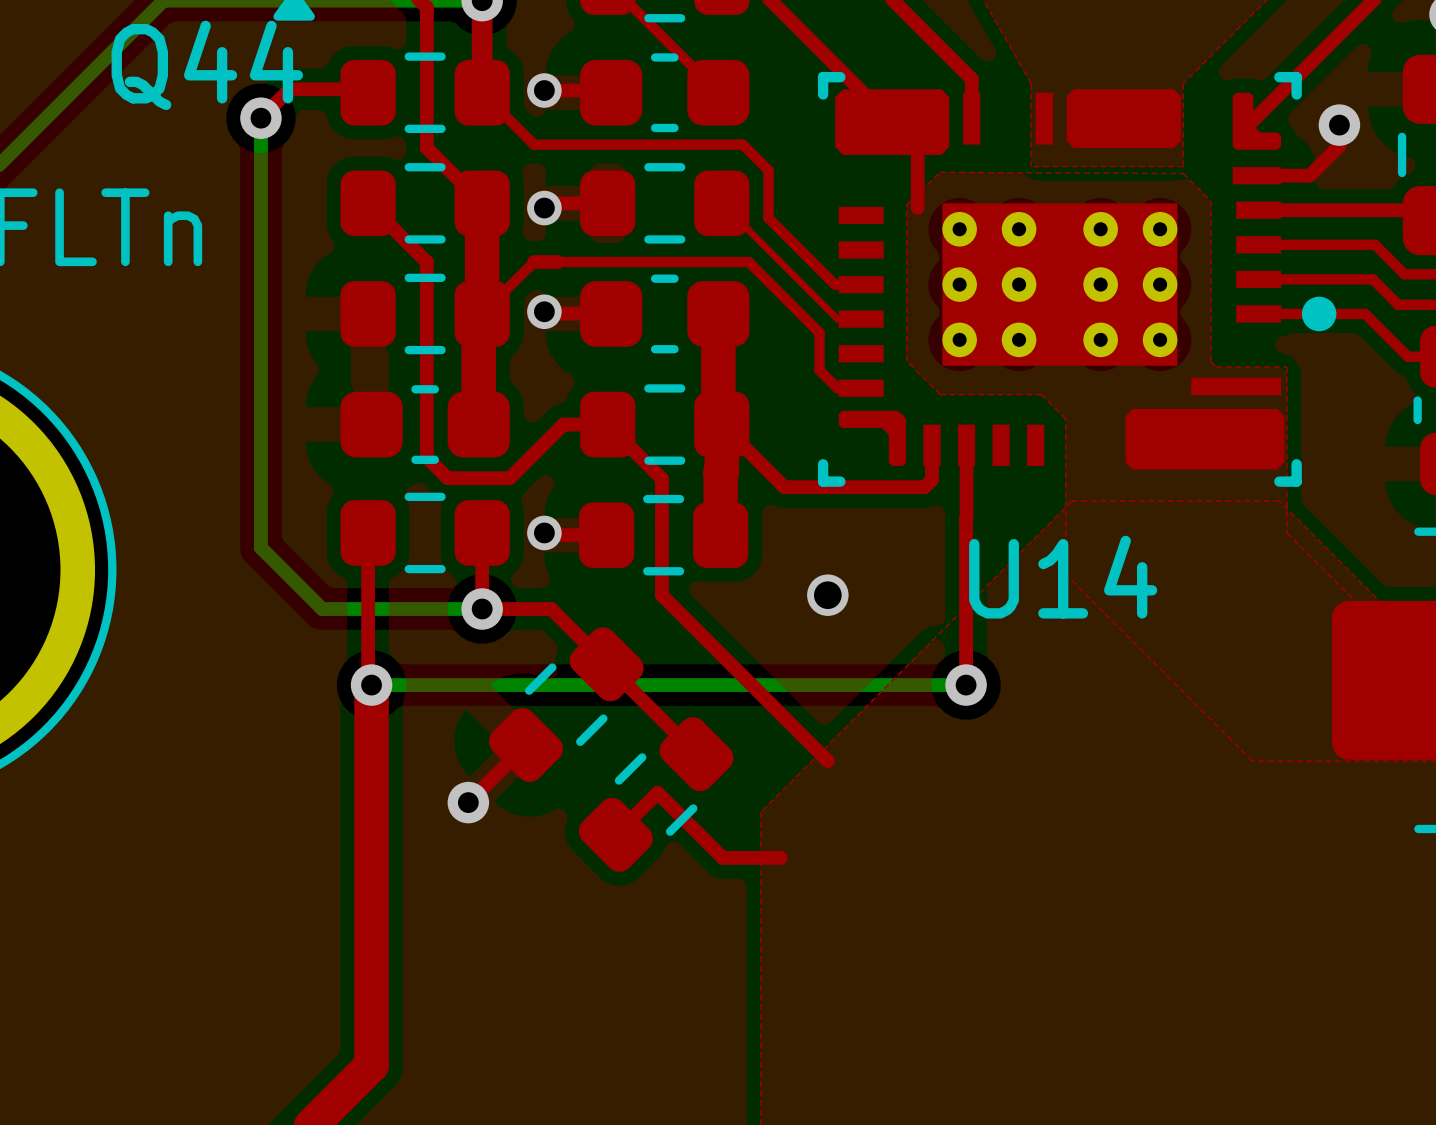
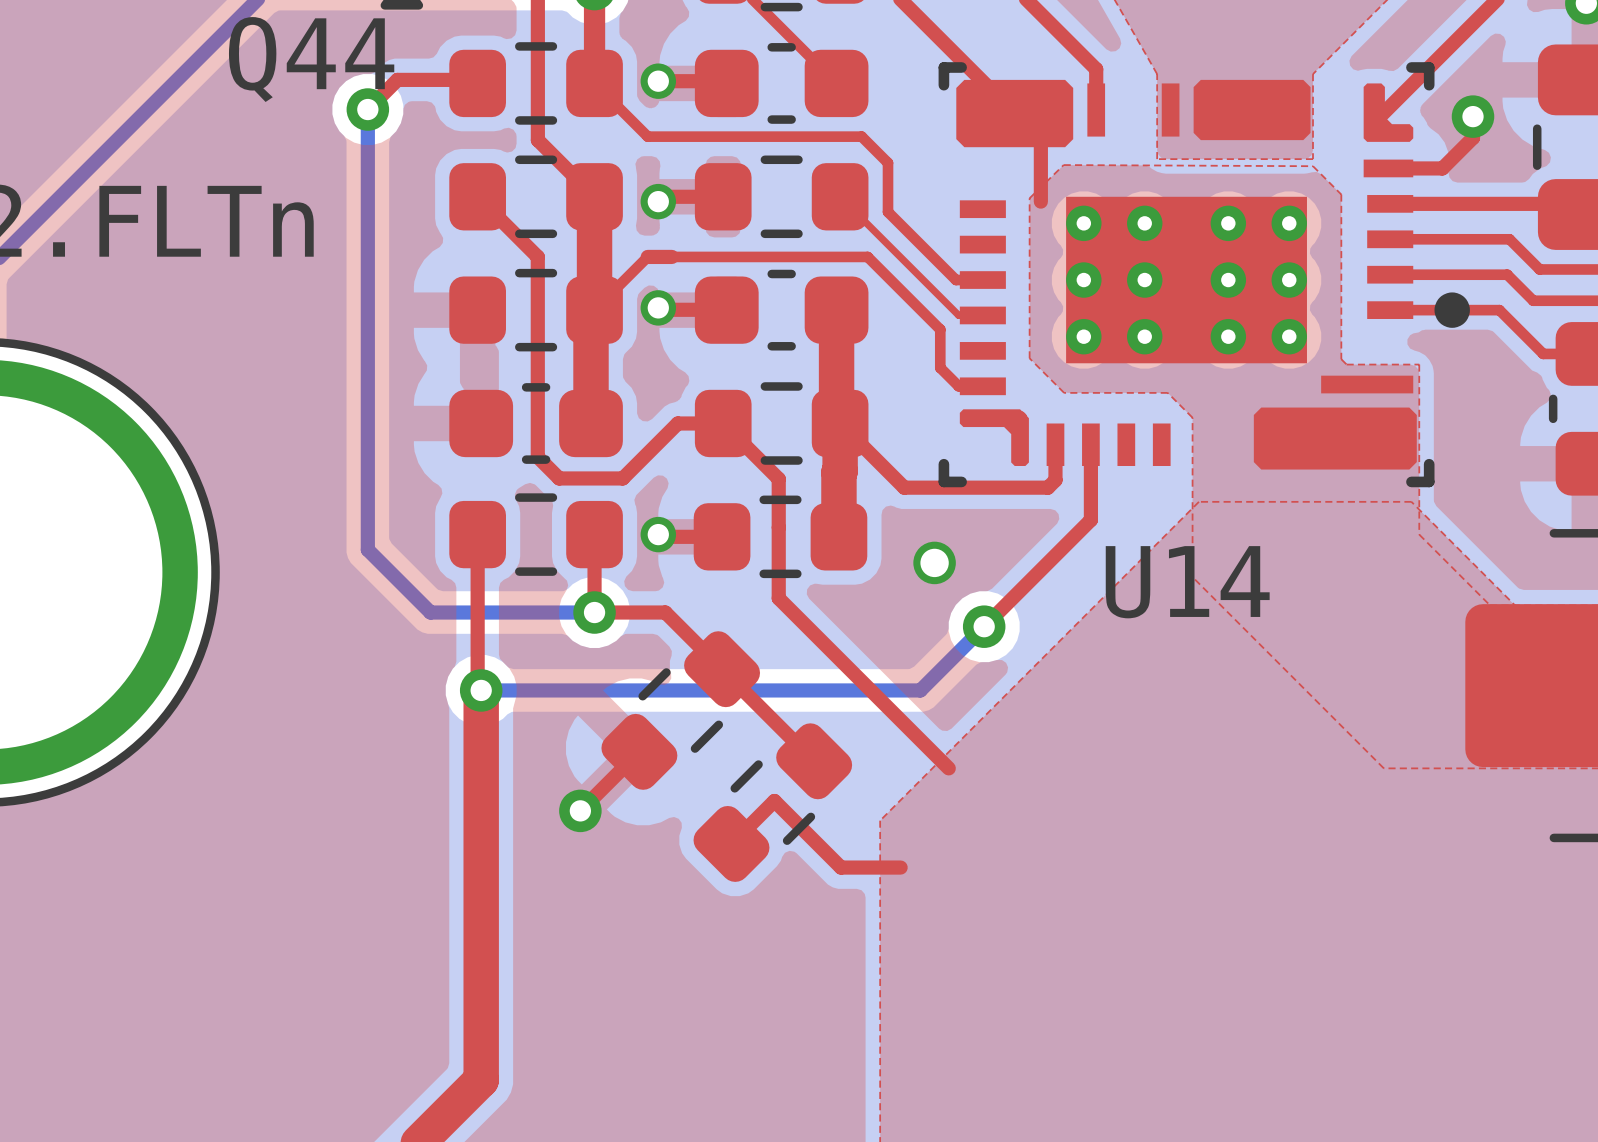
top track: (966, 519) (966, 685) -> (1090, 520) (984, 626)
via position: (827, 595) -> (934, 562)
bottom track: (800, 685) (966, 685) -> (920, 690) (984, 626)
via position: (966, 685) -> (984, 626)

